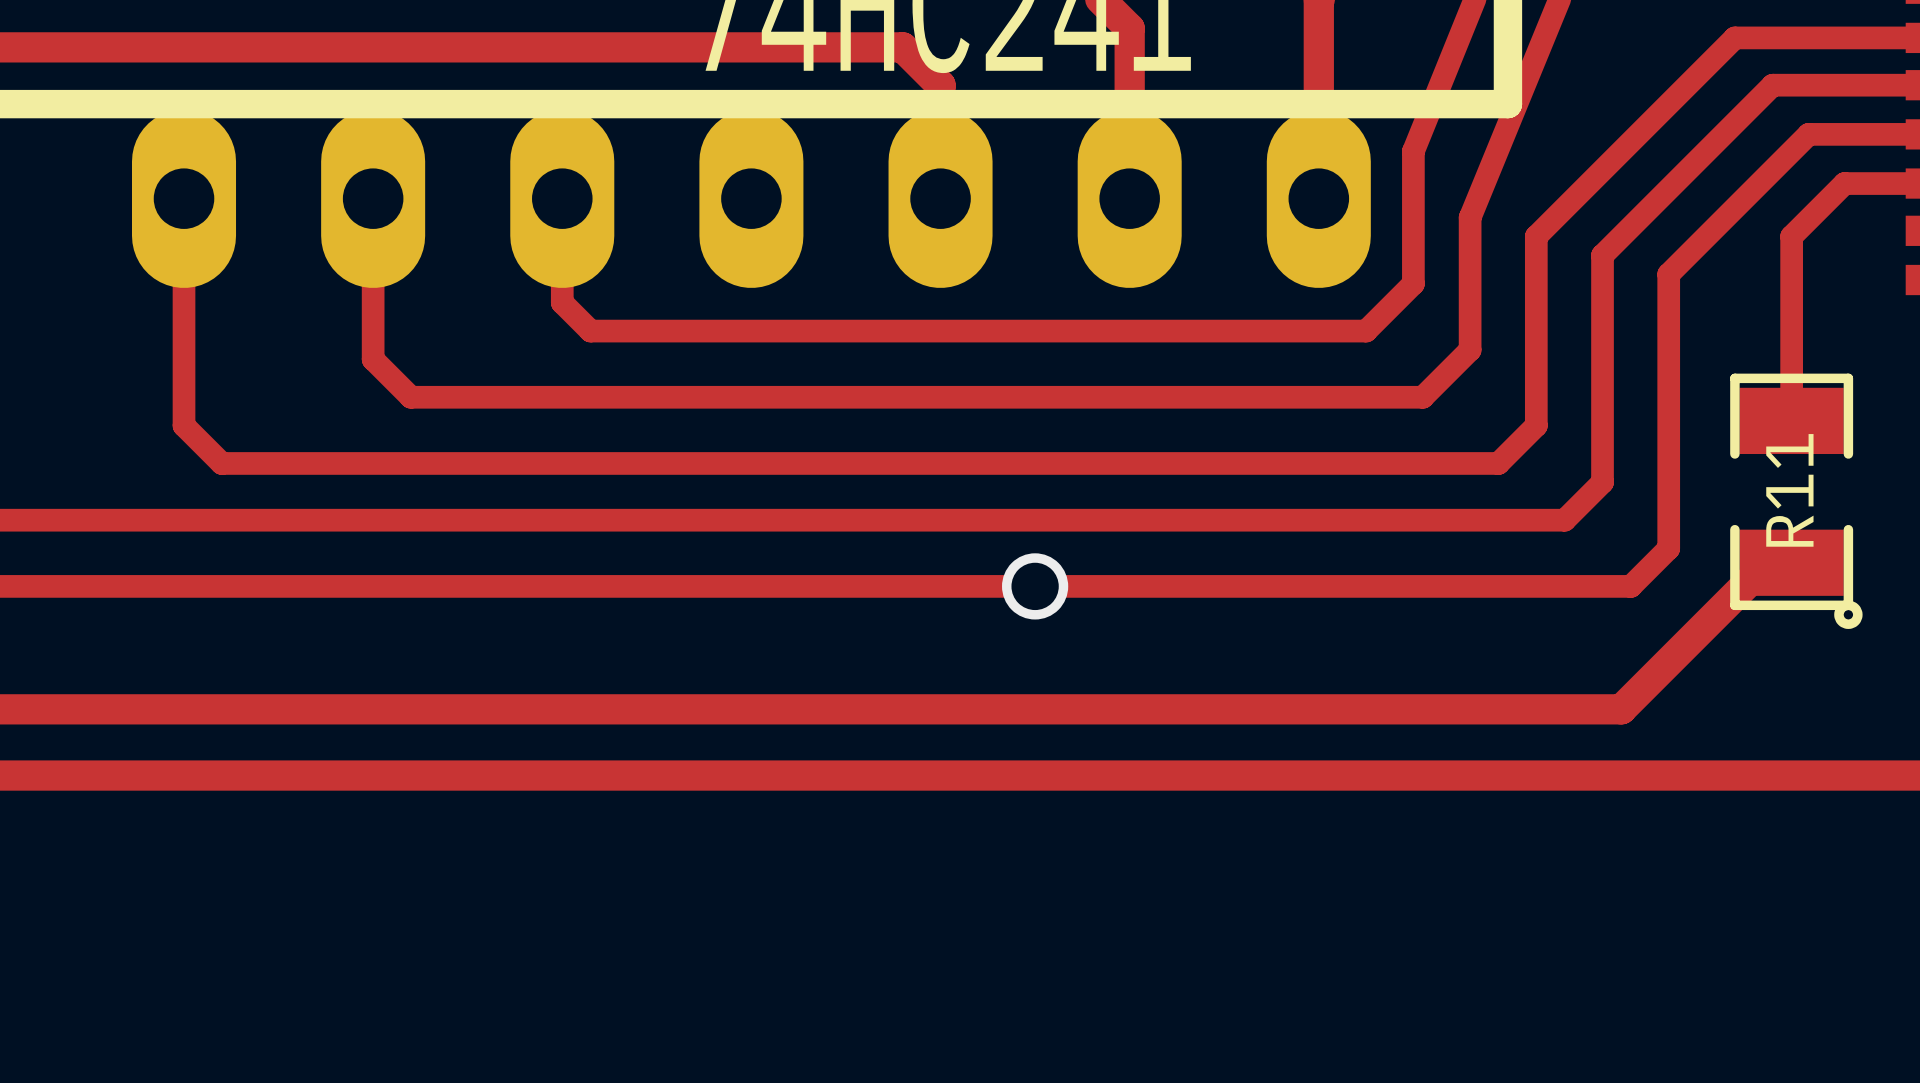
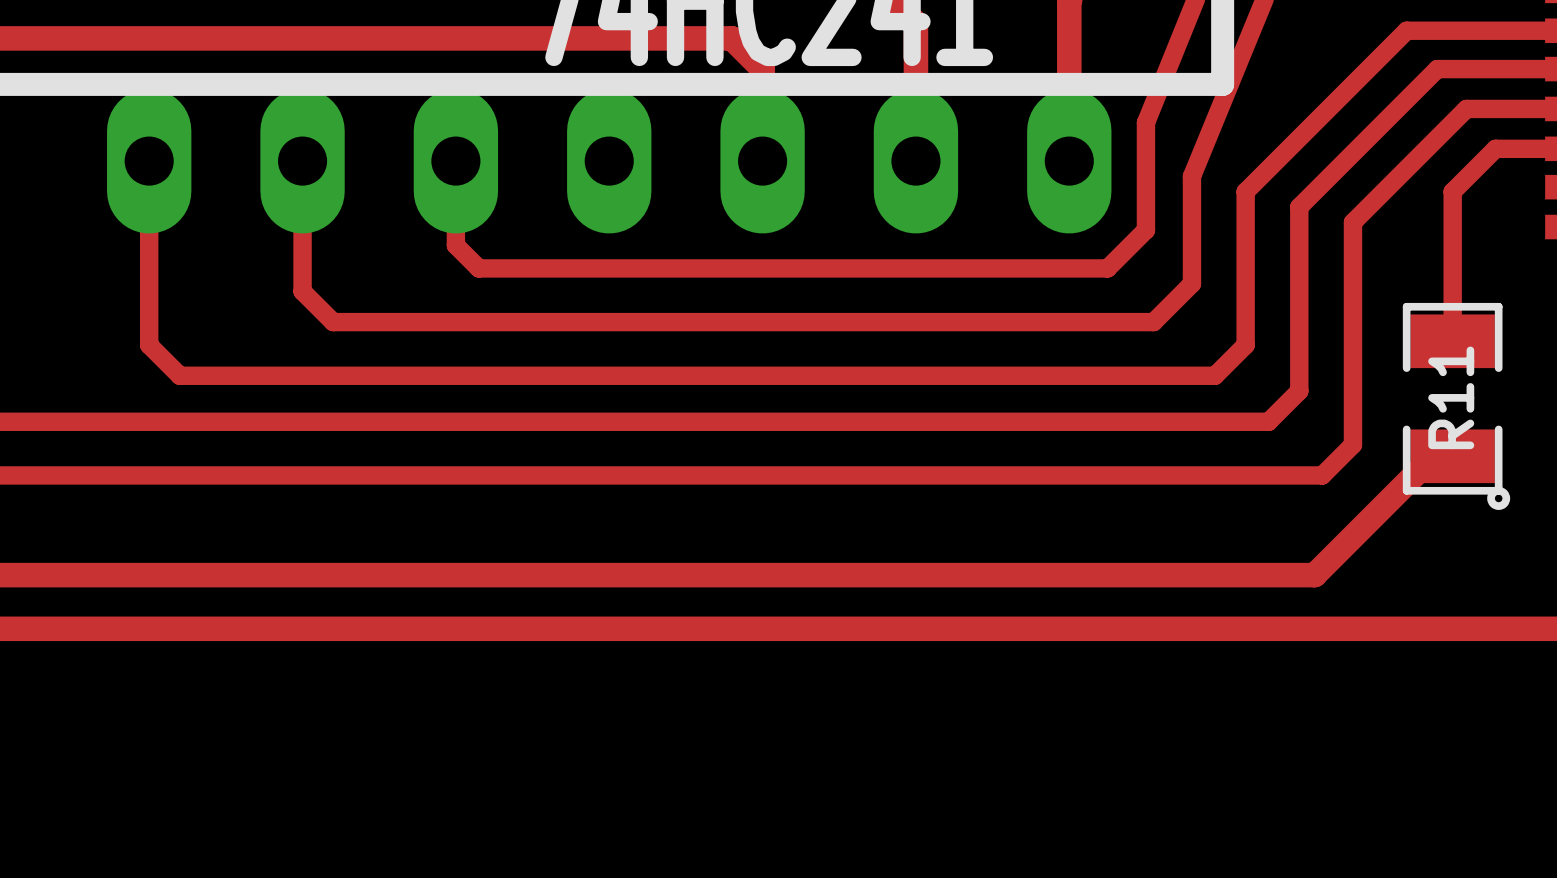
via: (1035, 586) -> none

